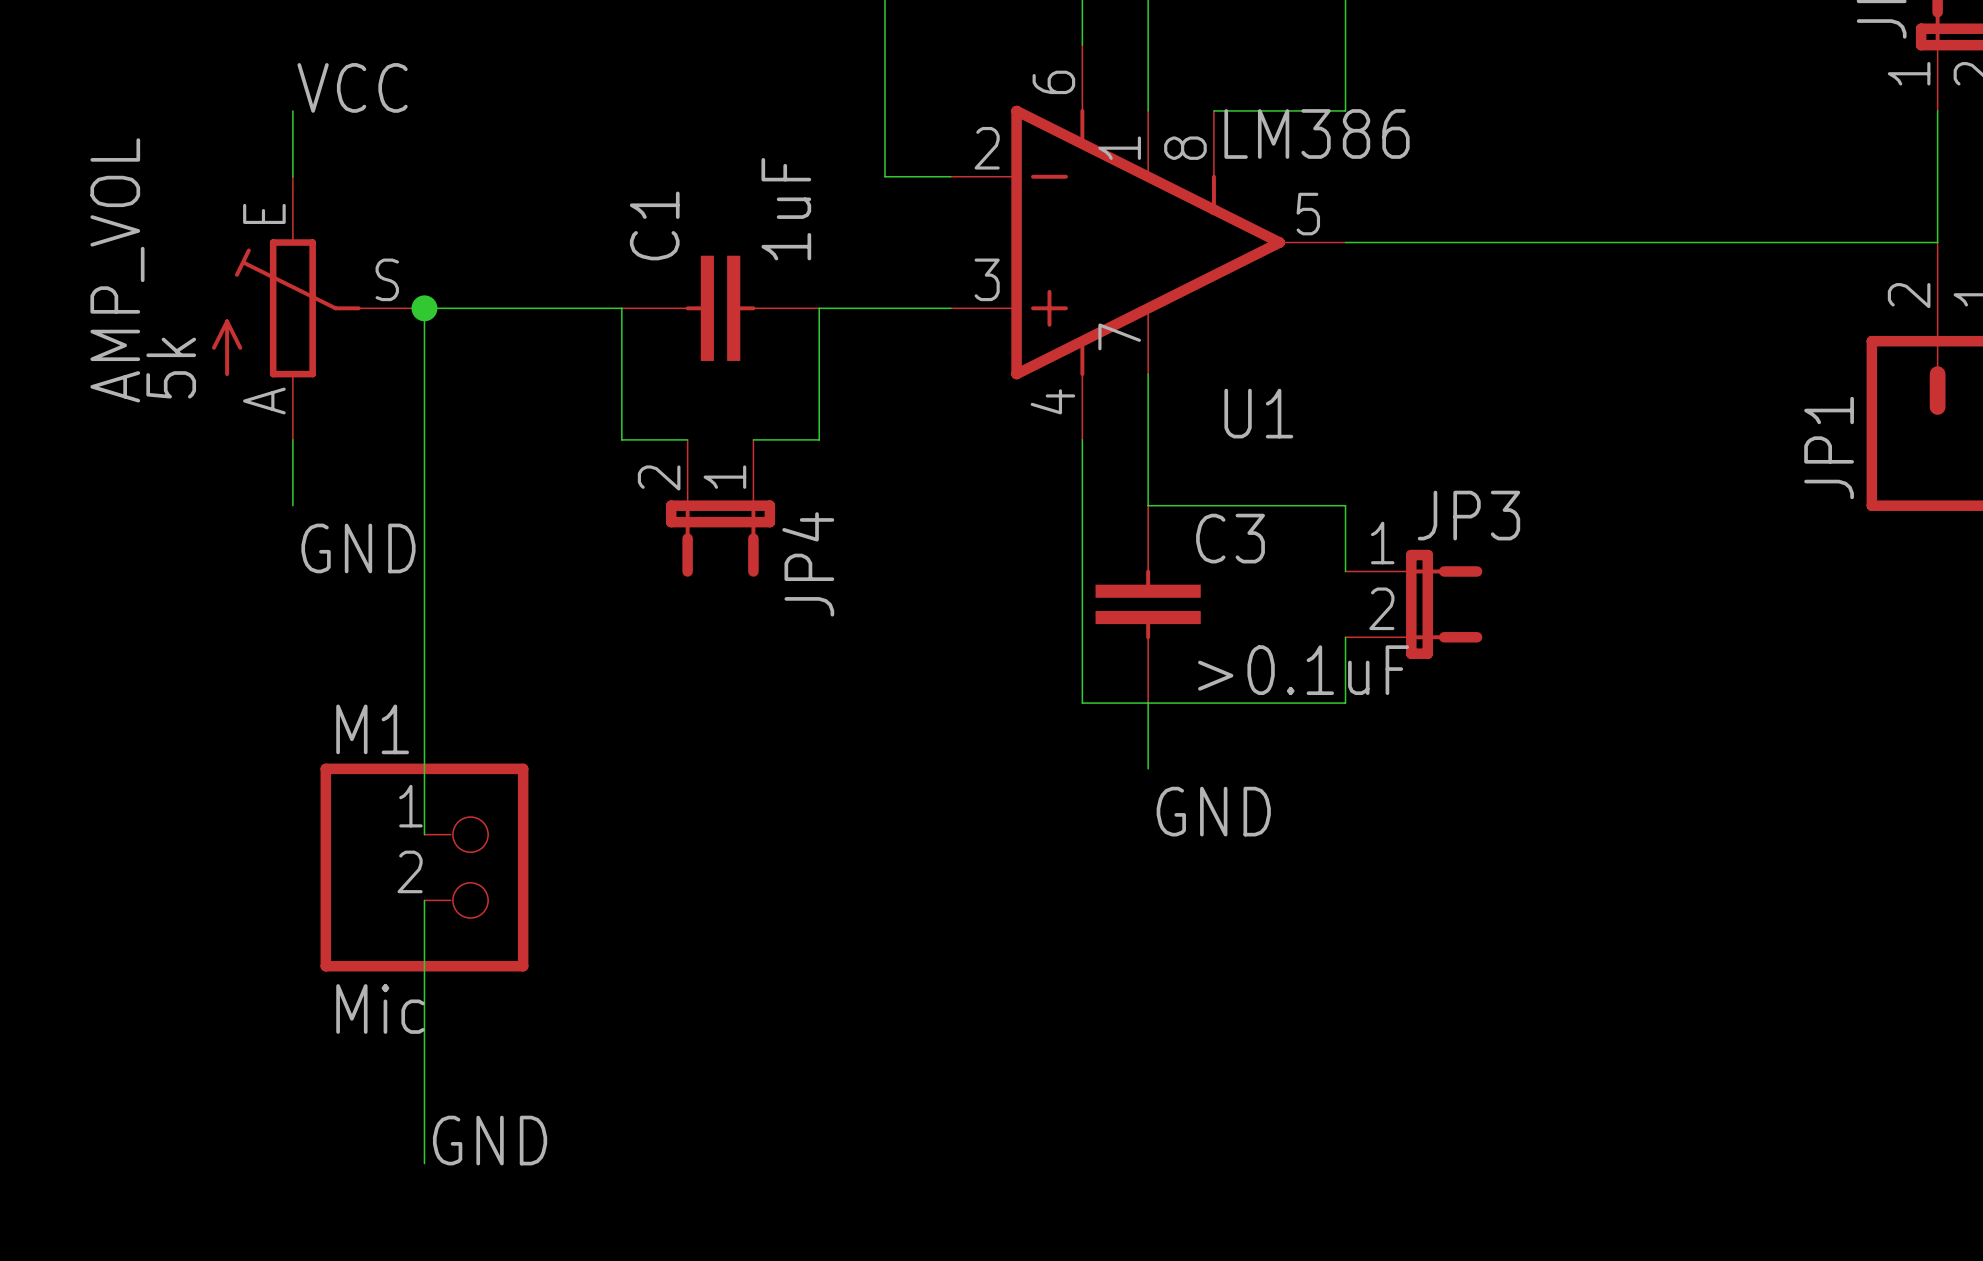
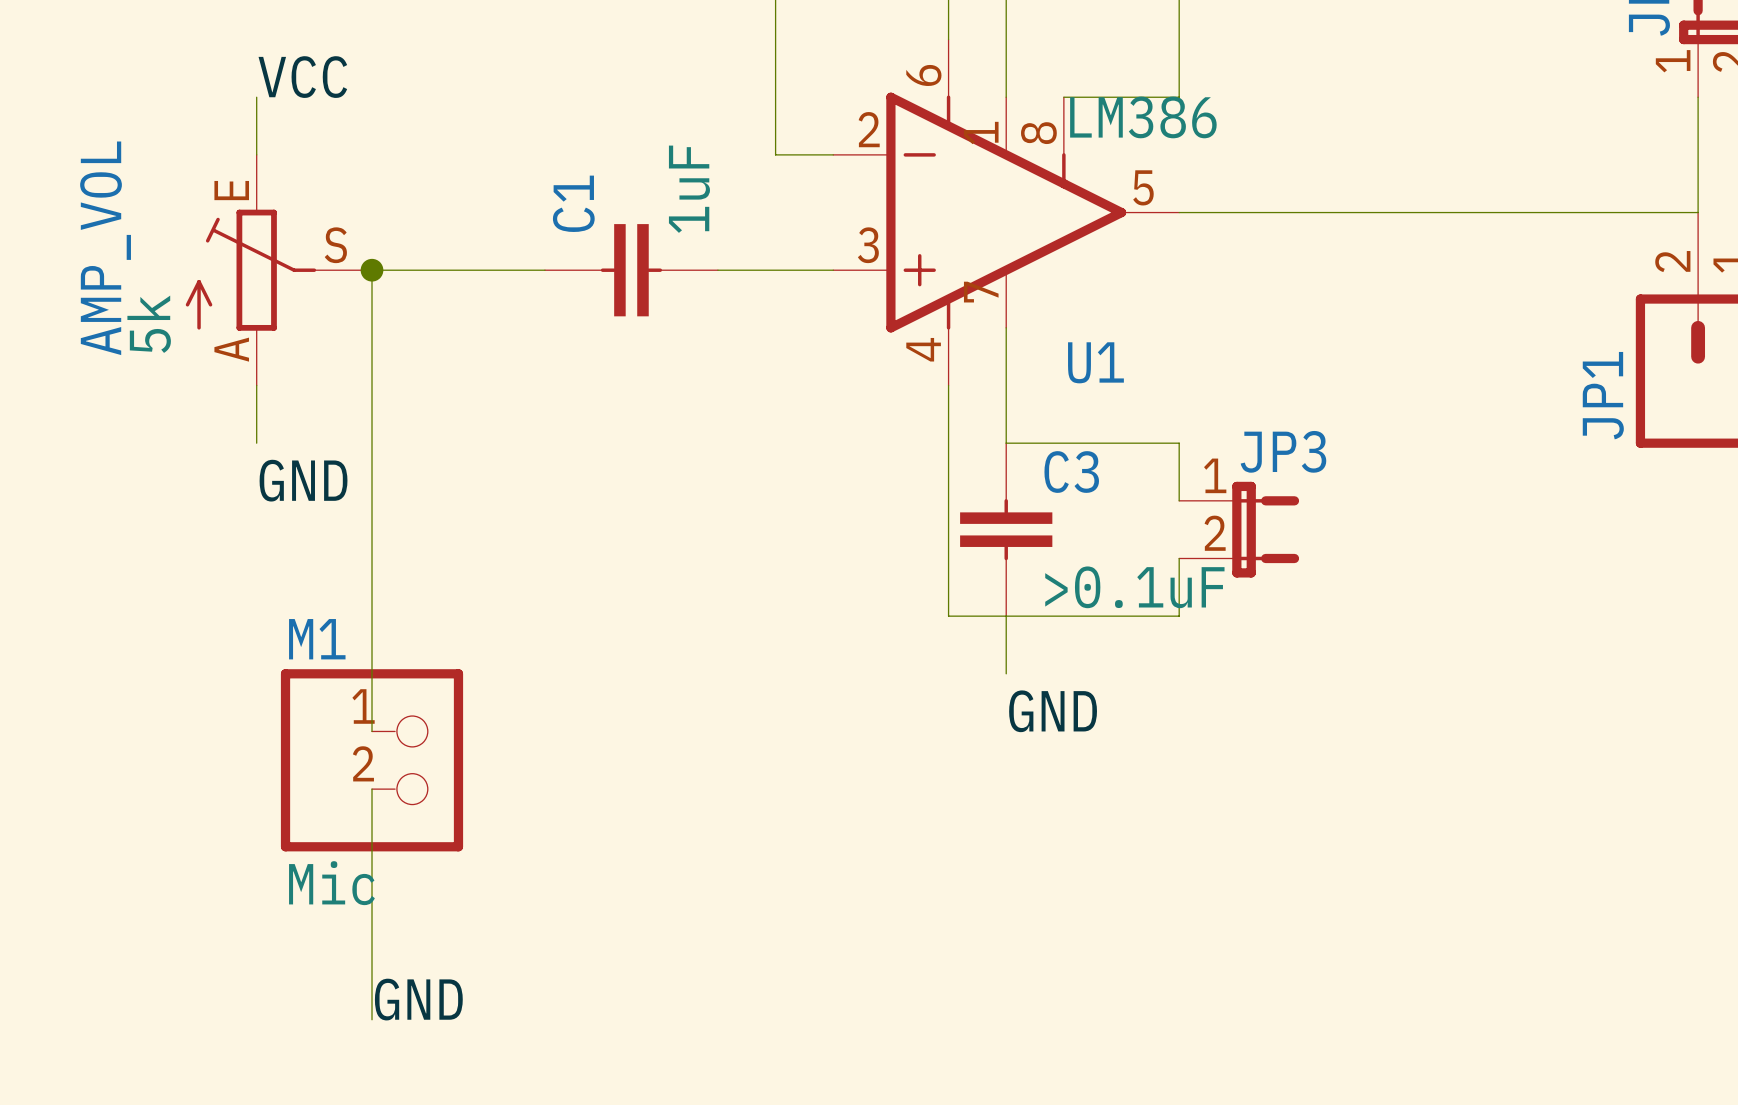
wire: (621, 308) (621, 439) (687, 439) -> none
wire: (819, 308) (819, 439) (753, 439) -> none
JP4: (720, 508) -> none

